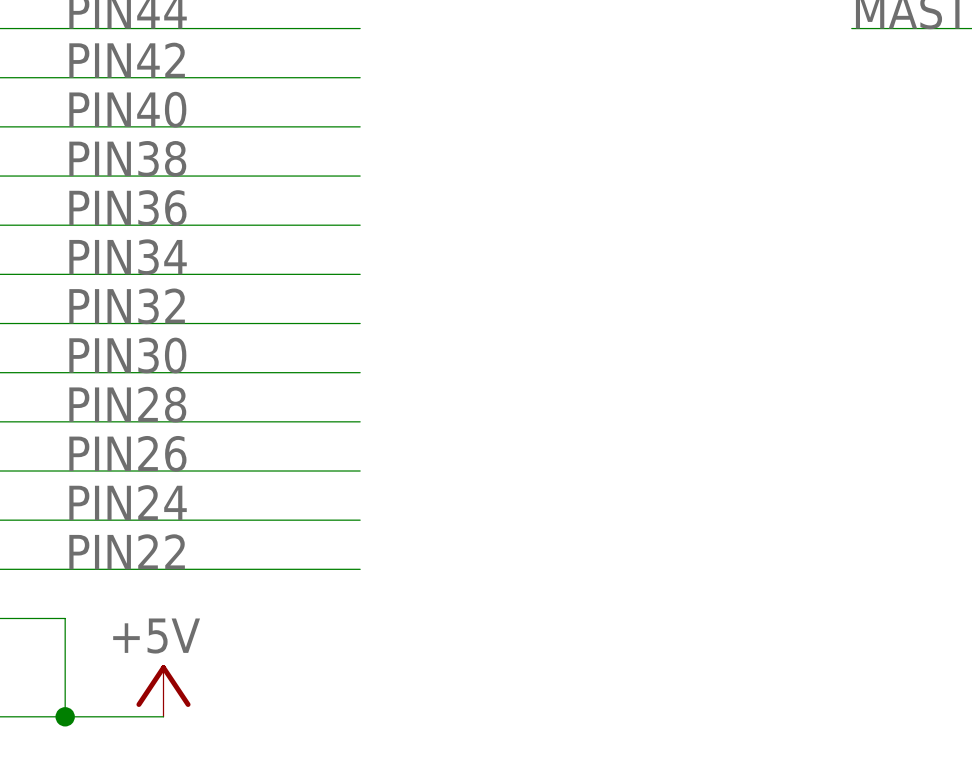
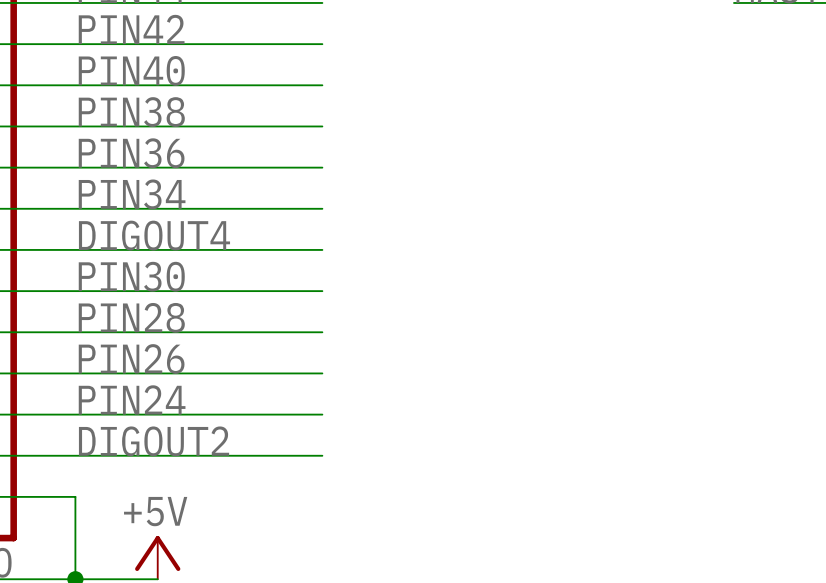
label: PIN32 (127, 306) -> DIGOUT4 (154, 235)
label: PIN22 (127, 551) -> DIGOUT2 (154, 441)

